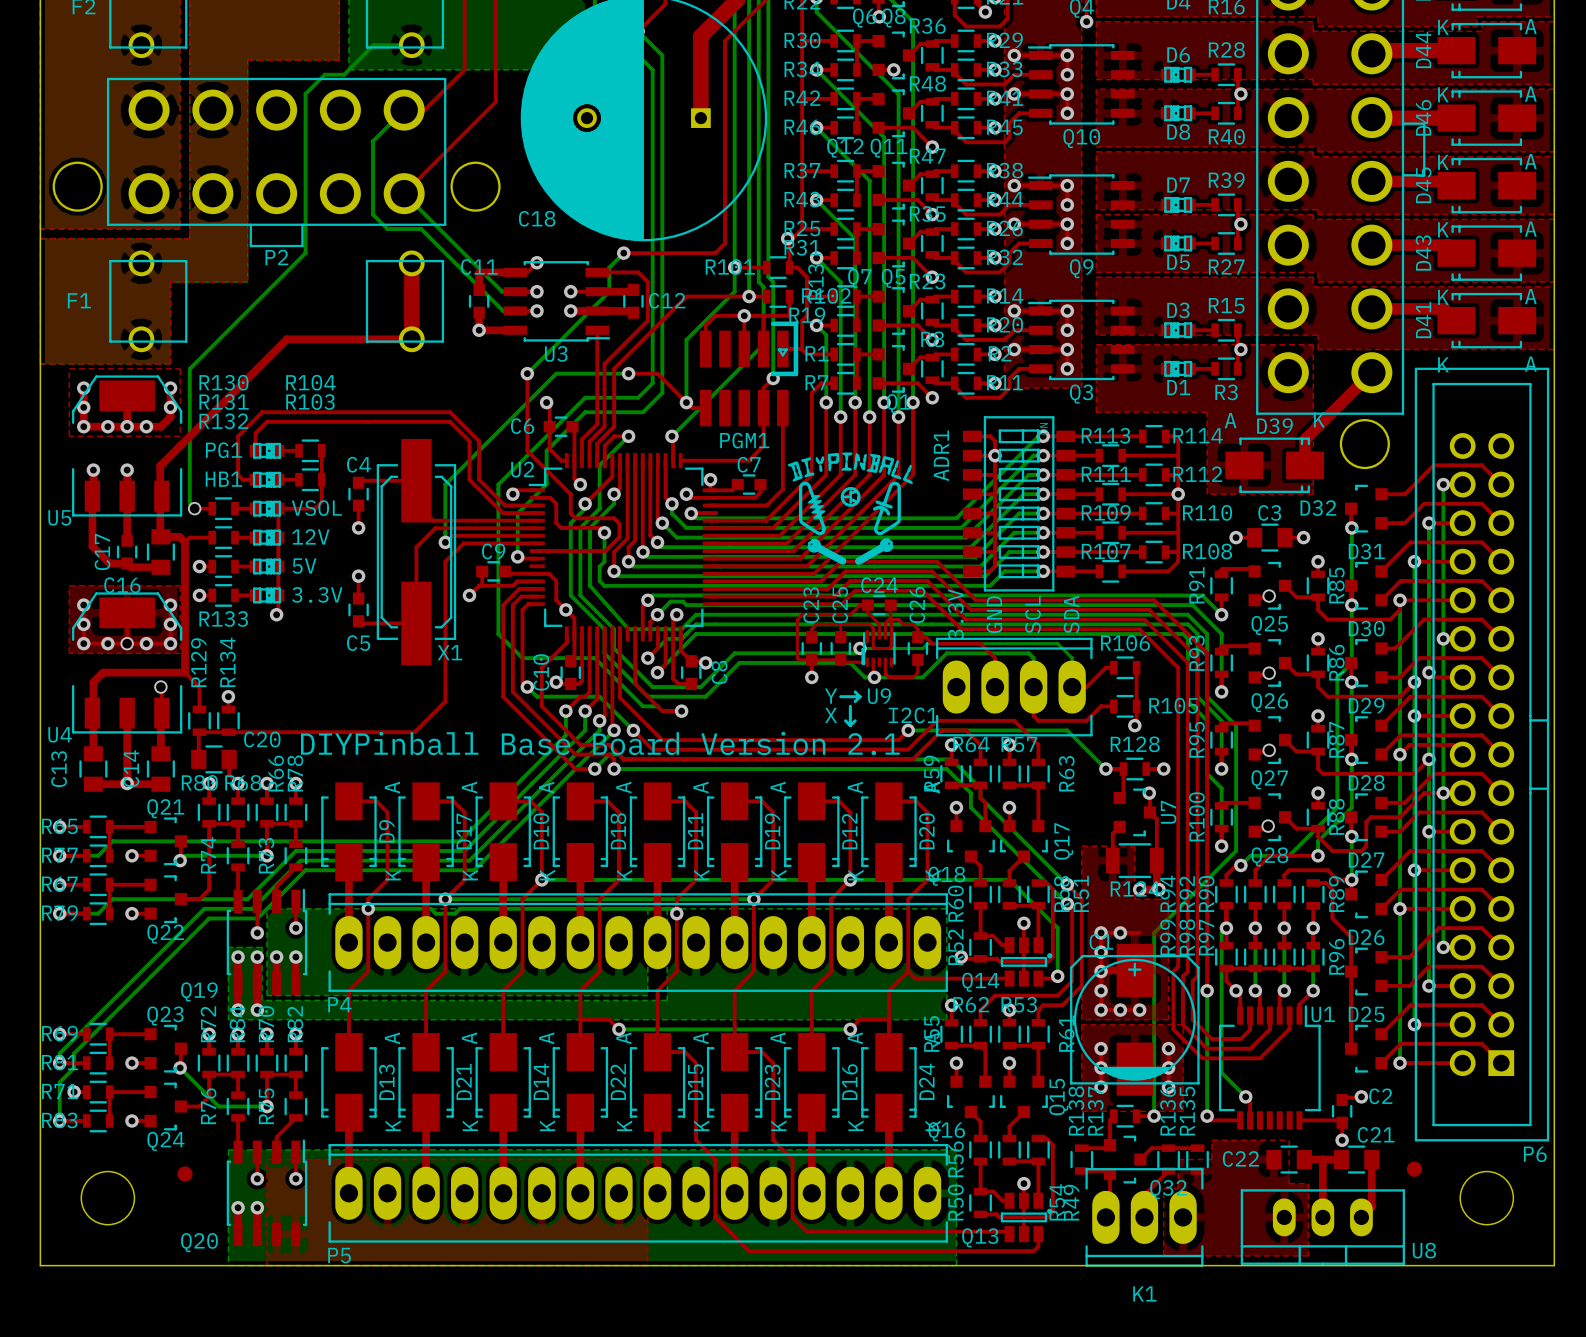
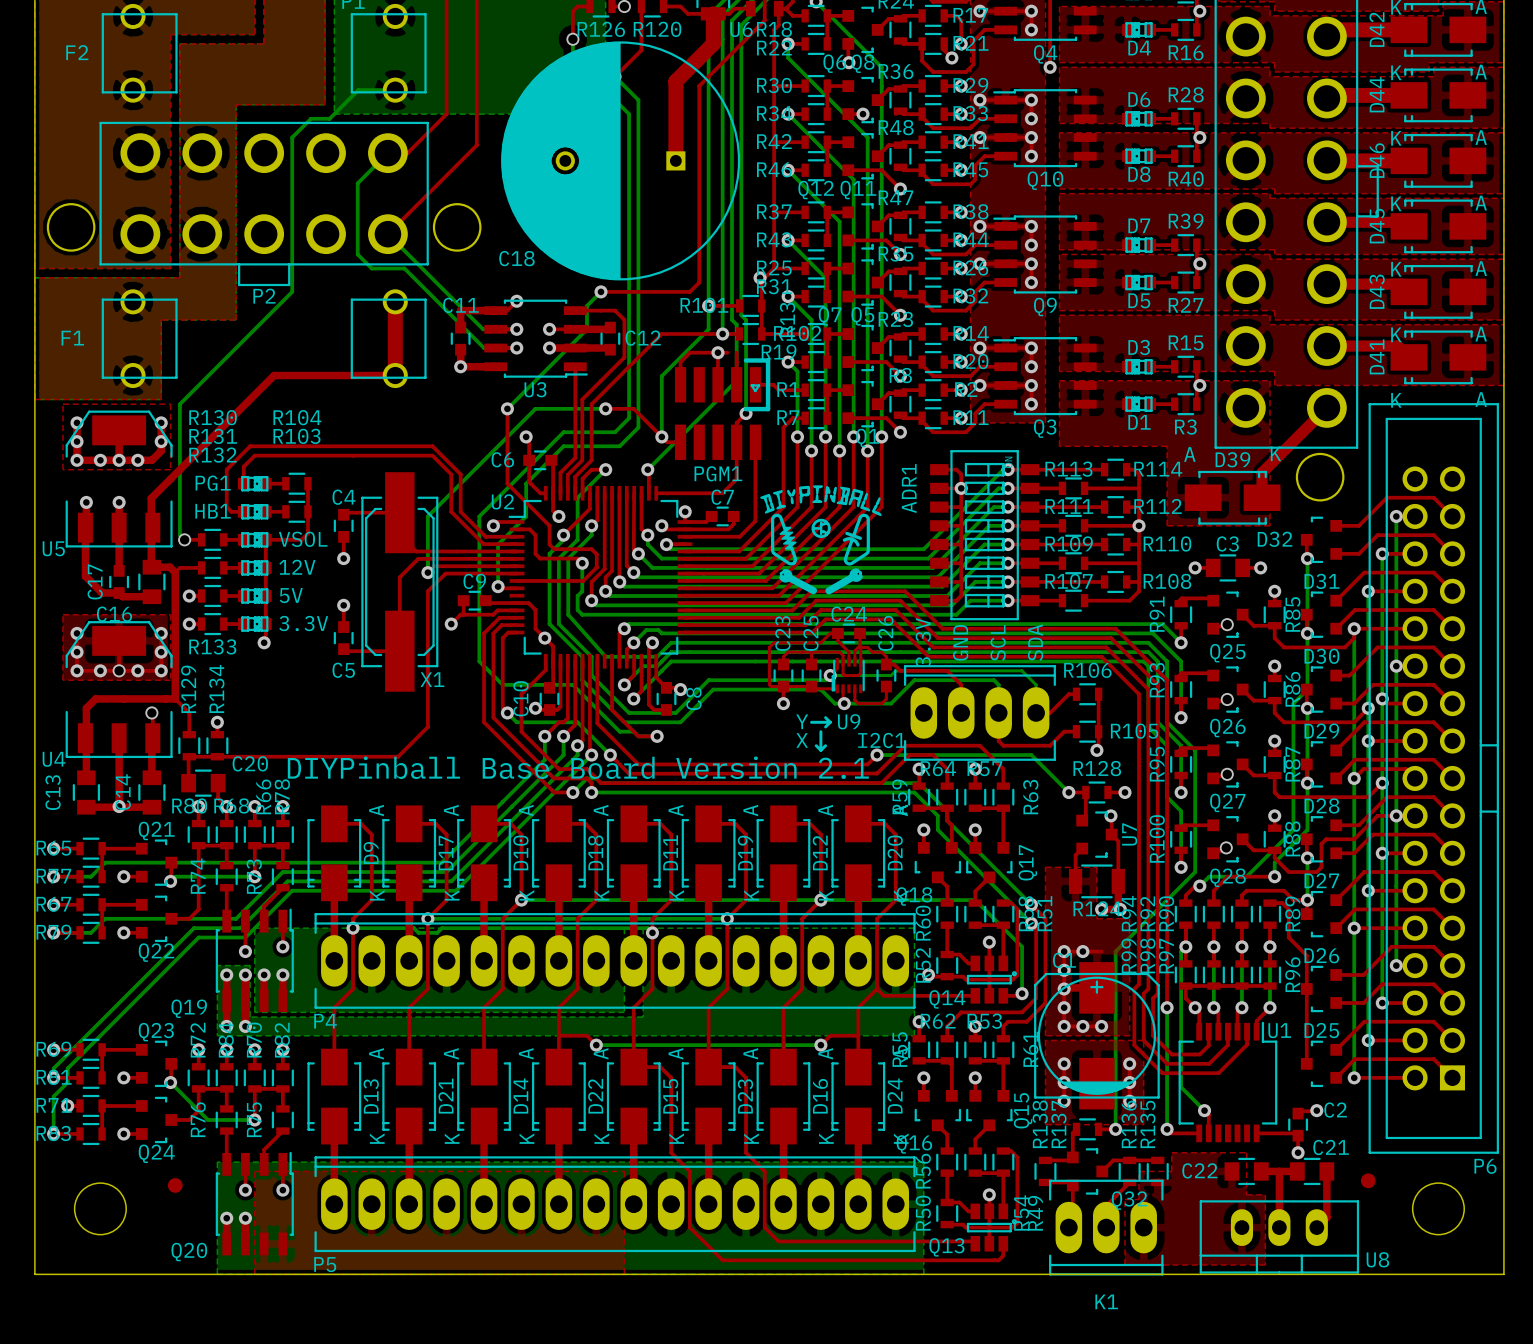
top track: (789, 267) (797, 267) (806, 277) (806, 315) (802, 320) (802, 349) -> (761, 305) (761, 334) (778, 334)
top track: (789, 296) (789, 314) (787, 315) (753, 315) -> none

